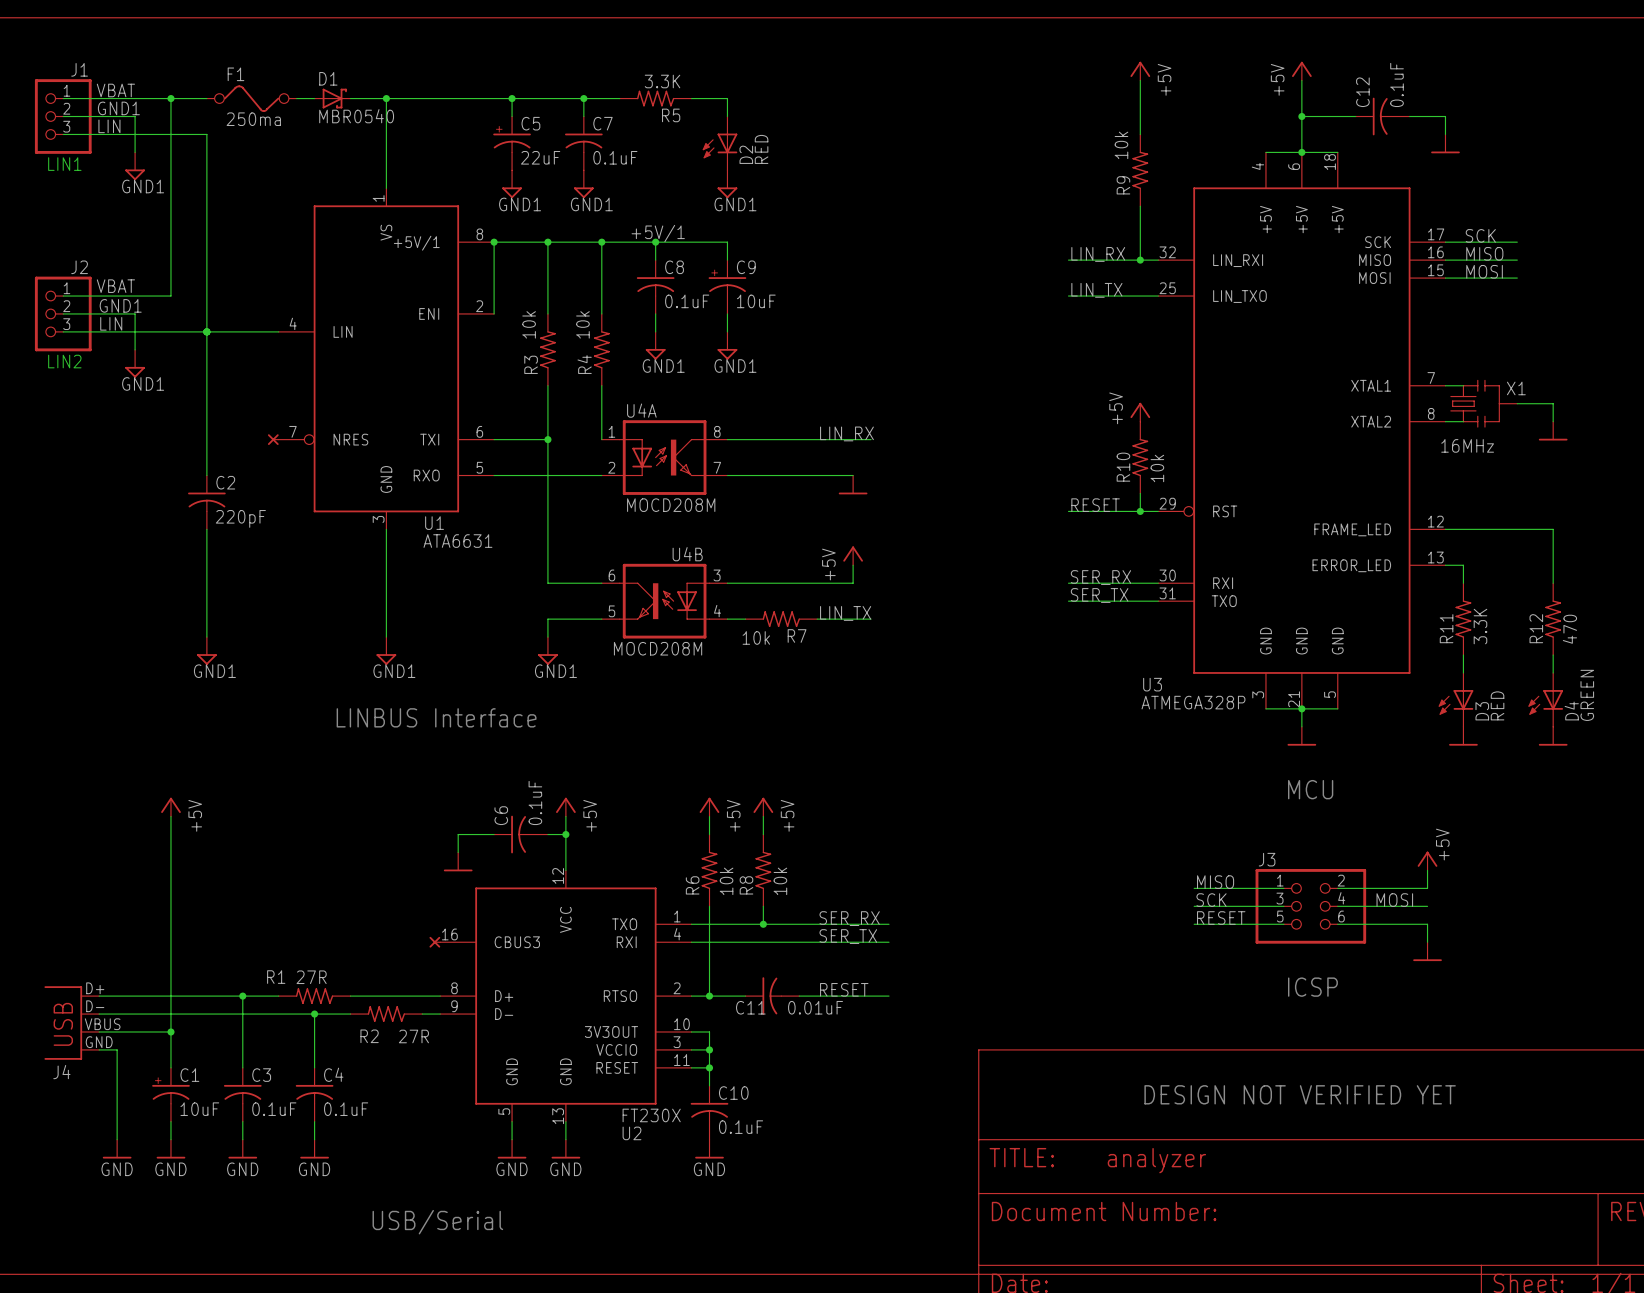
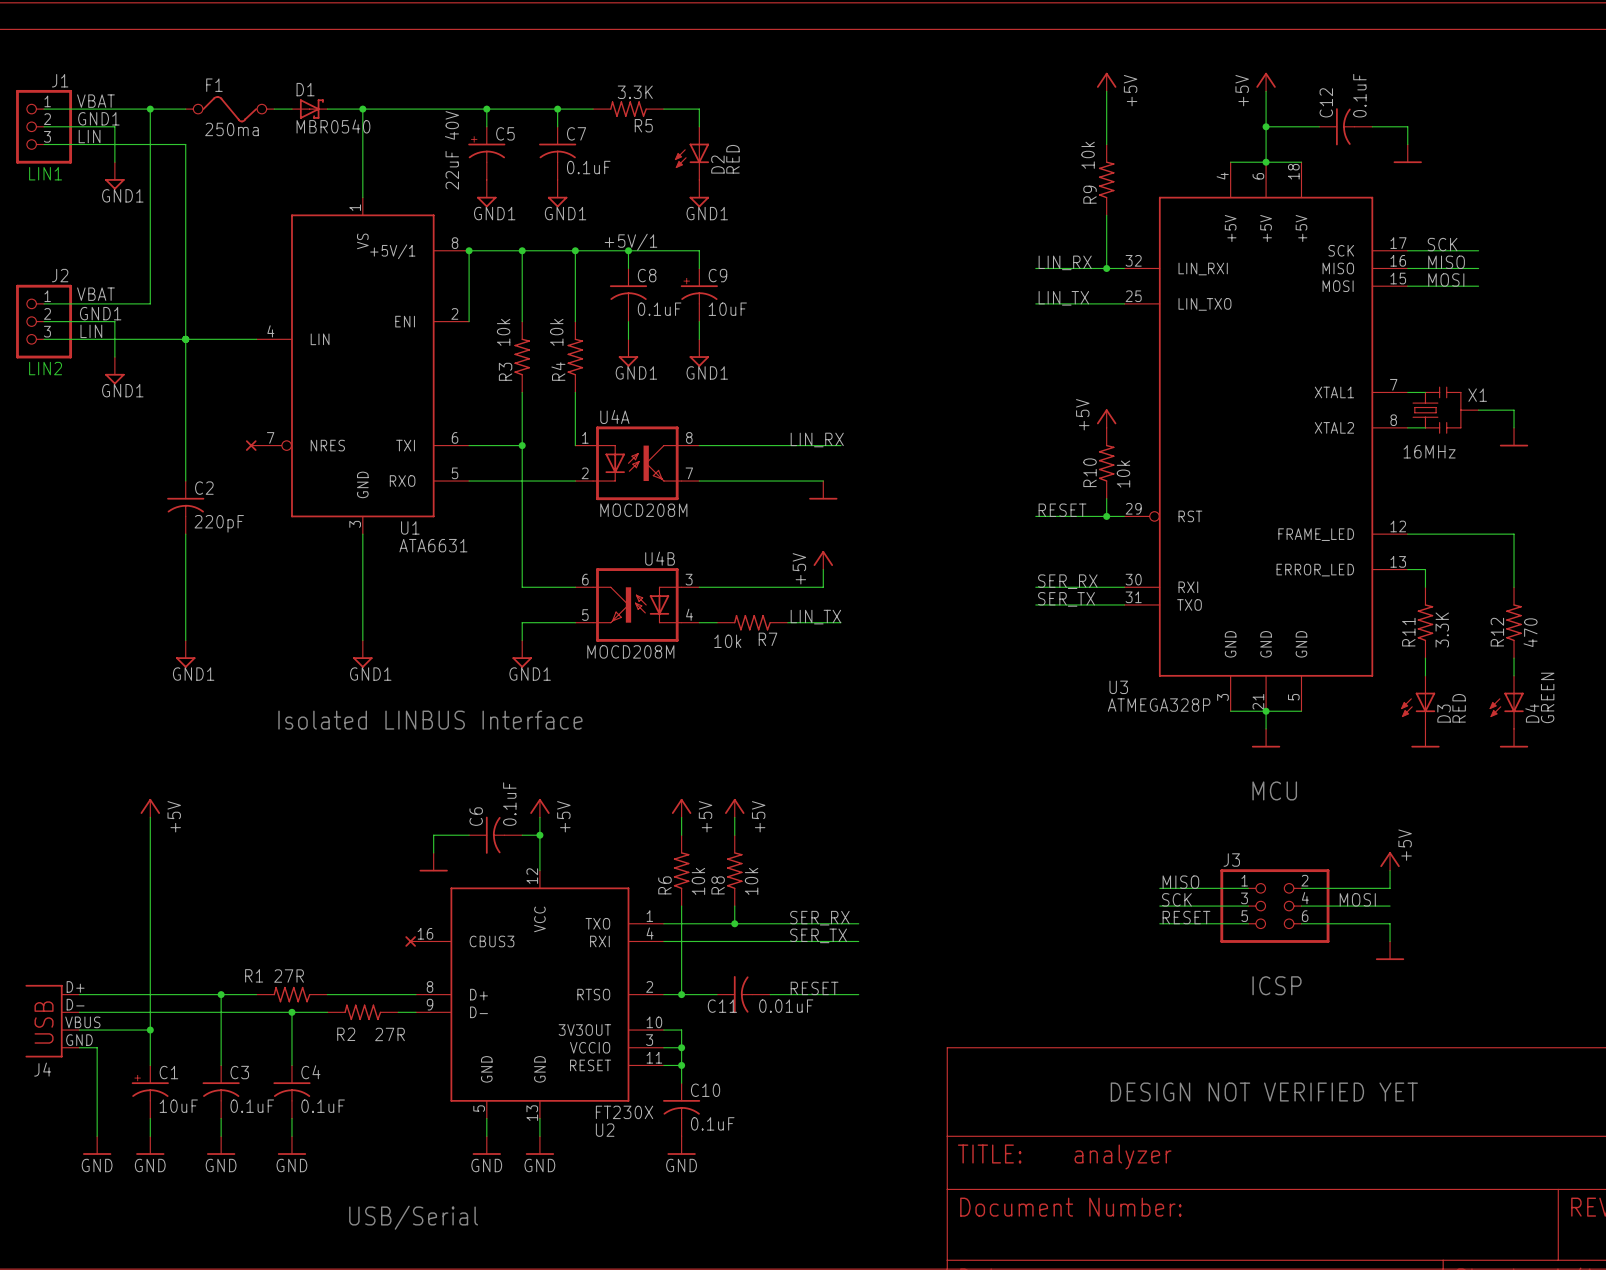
C5 value: 22uF (540, 157) -> 22uF 40V (451, 150)
text: LINBUS Interface (436, 717) -> Isolated LINBUS Interface (430, 720)

